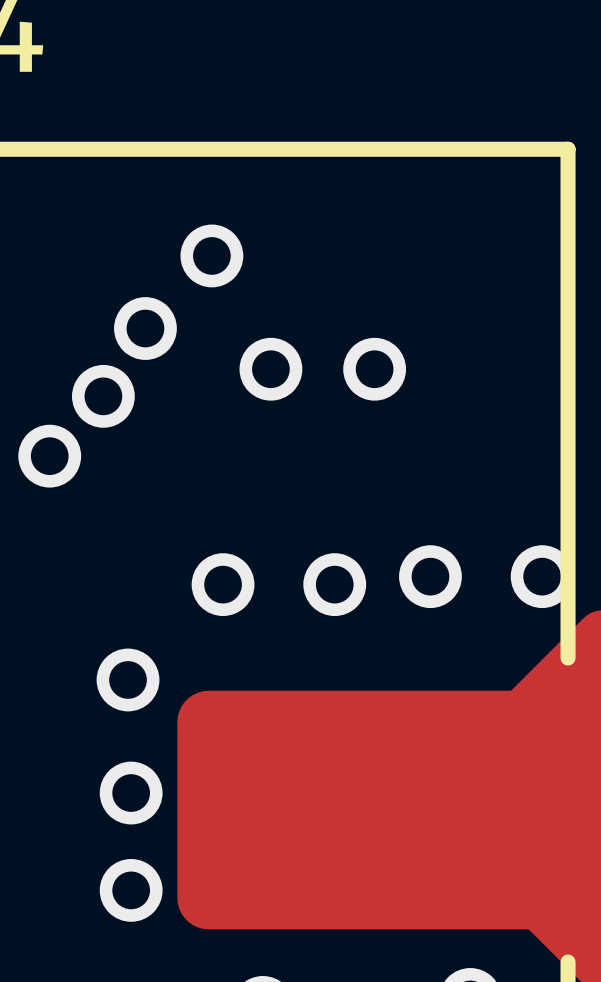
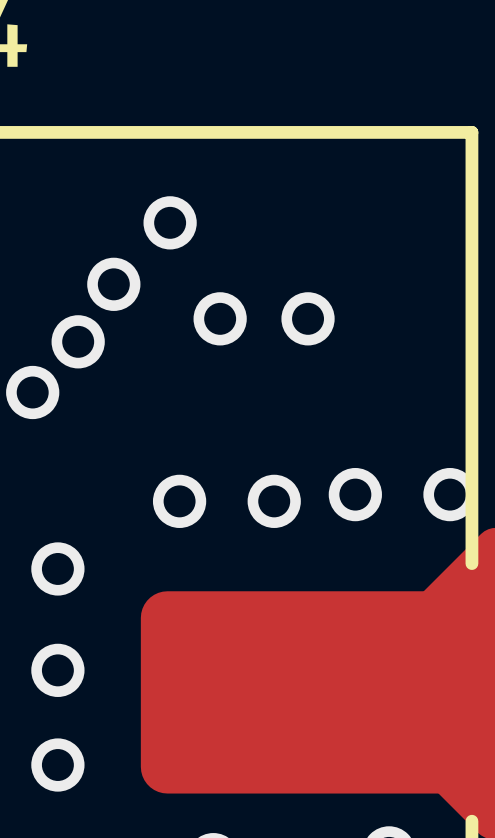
via position: (128, 679) -> (57, 568)
via position: (131, 793) -> (57, 670)
via position: (131, 890) -> (57, 765)

